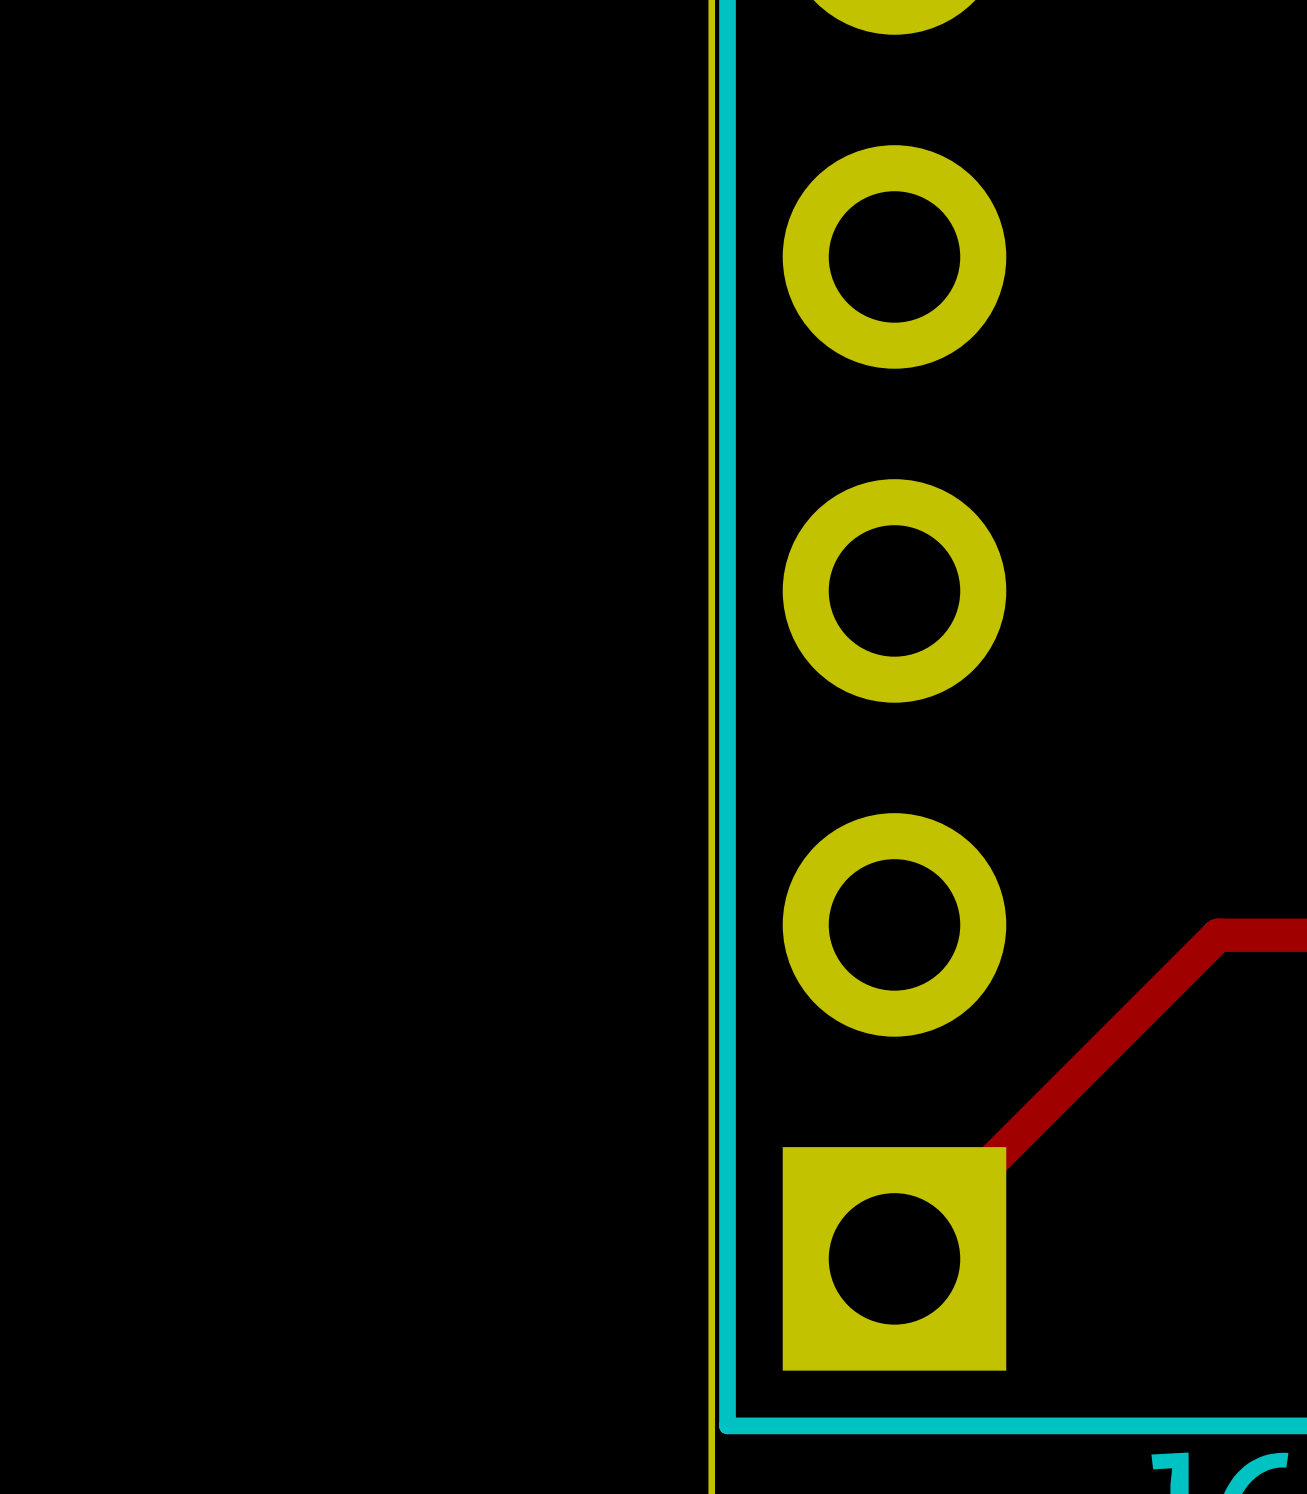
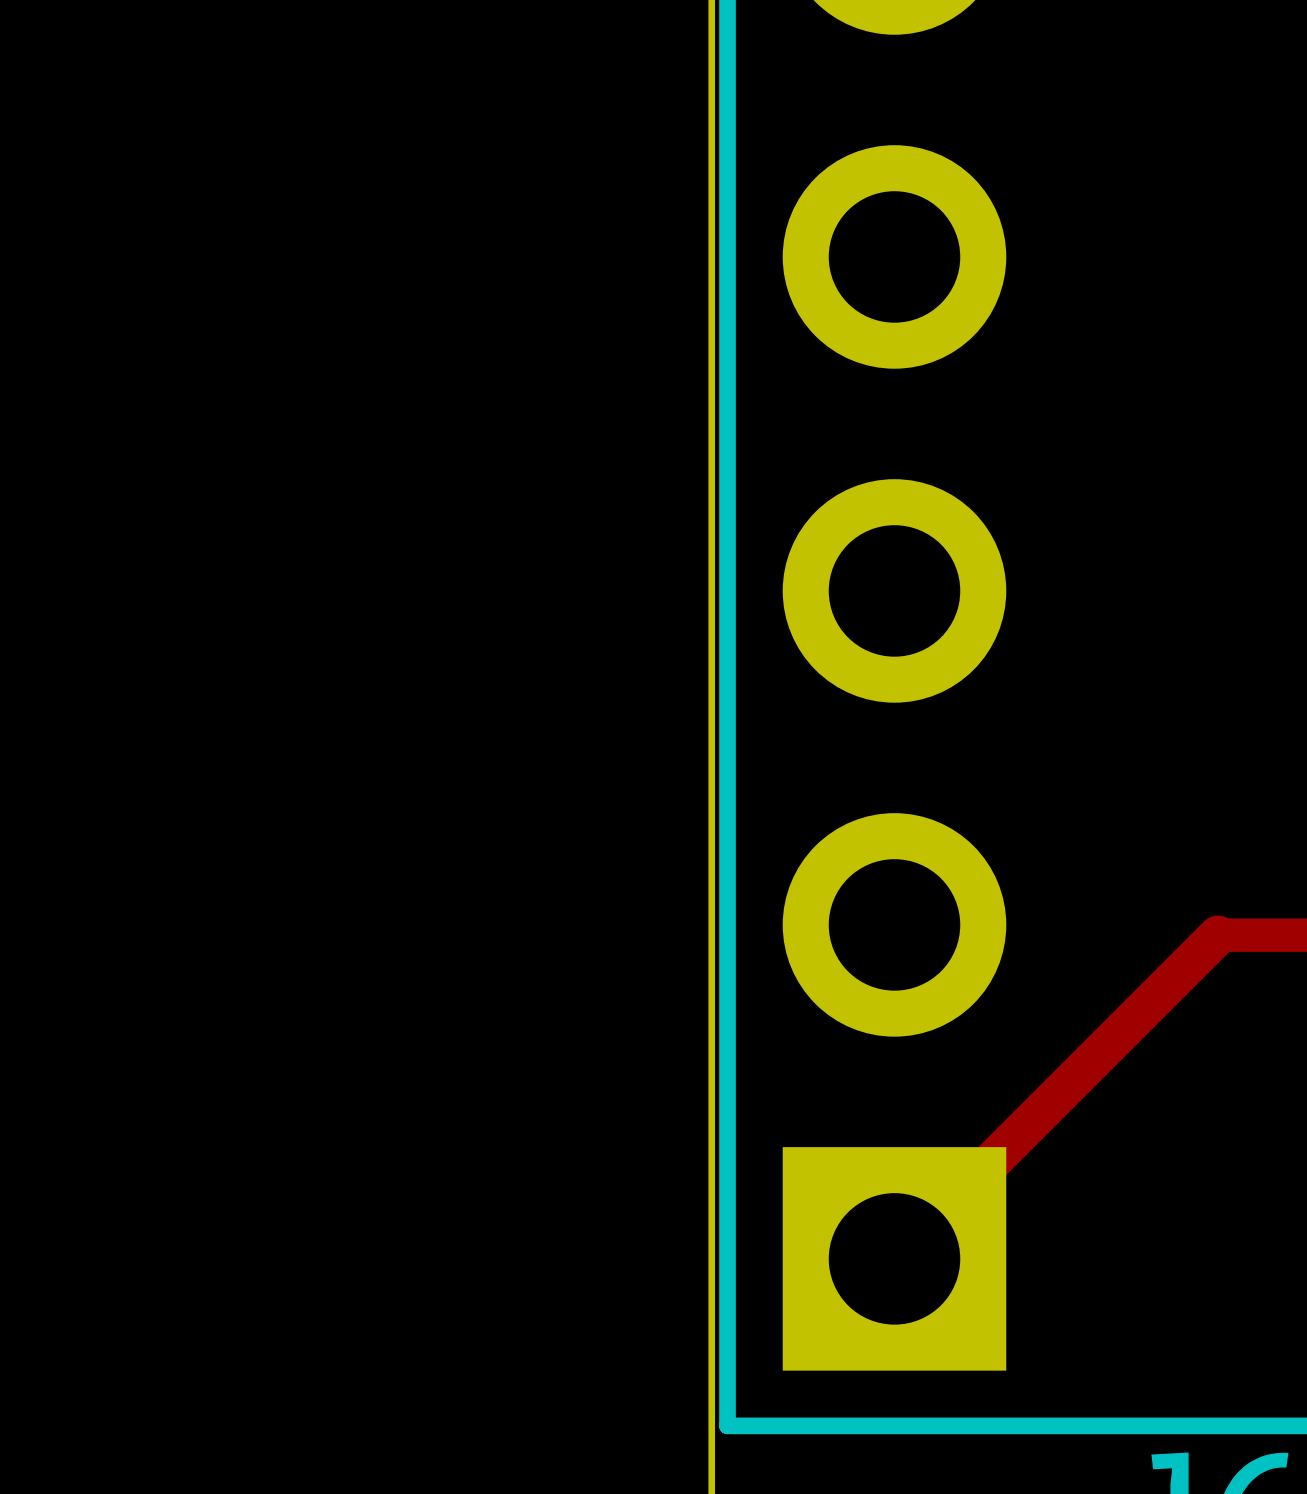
track width: thin (1218, 935) (894, 1258) -> thick (1218, 935) (894, 1258)

